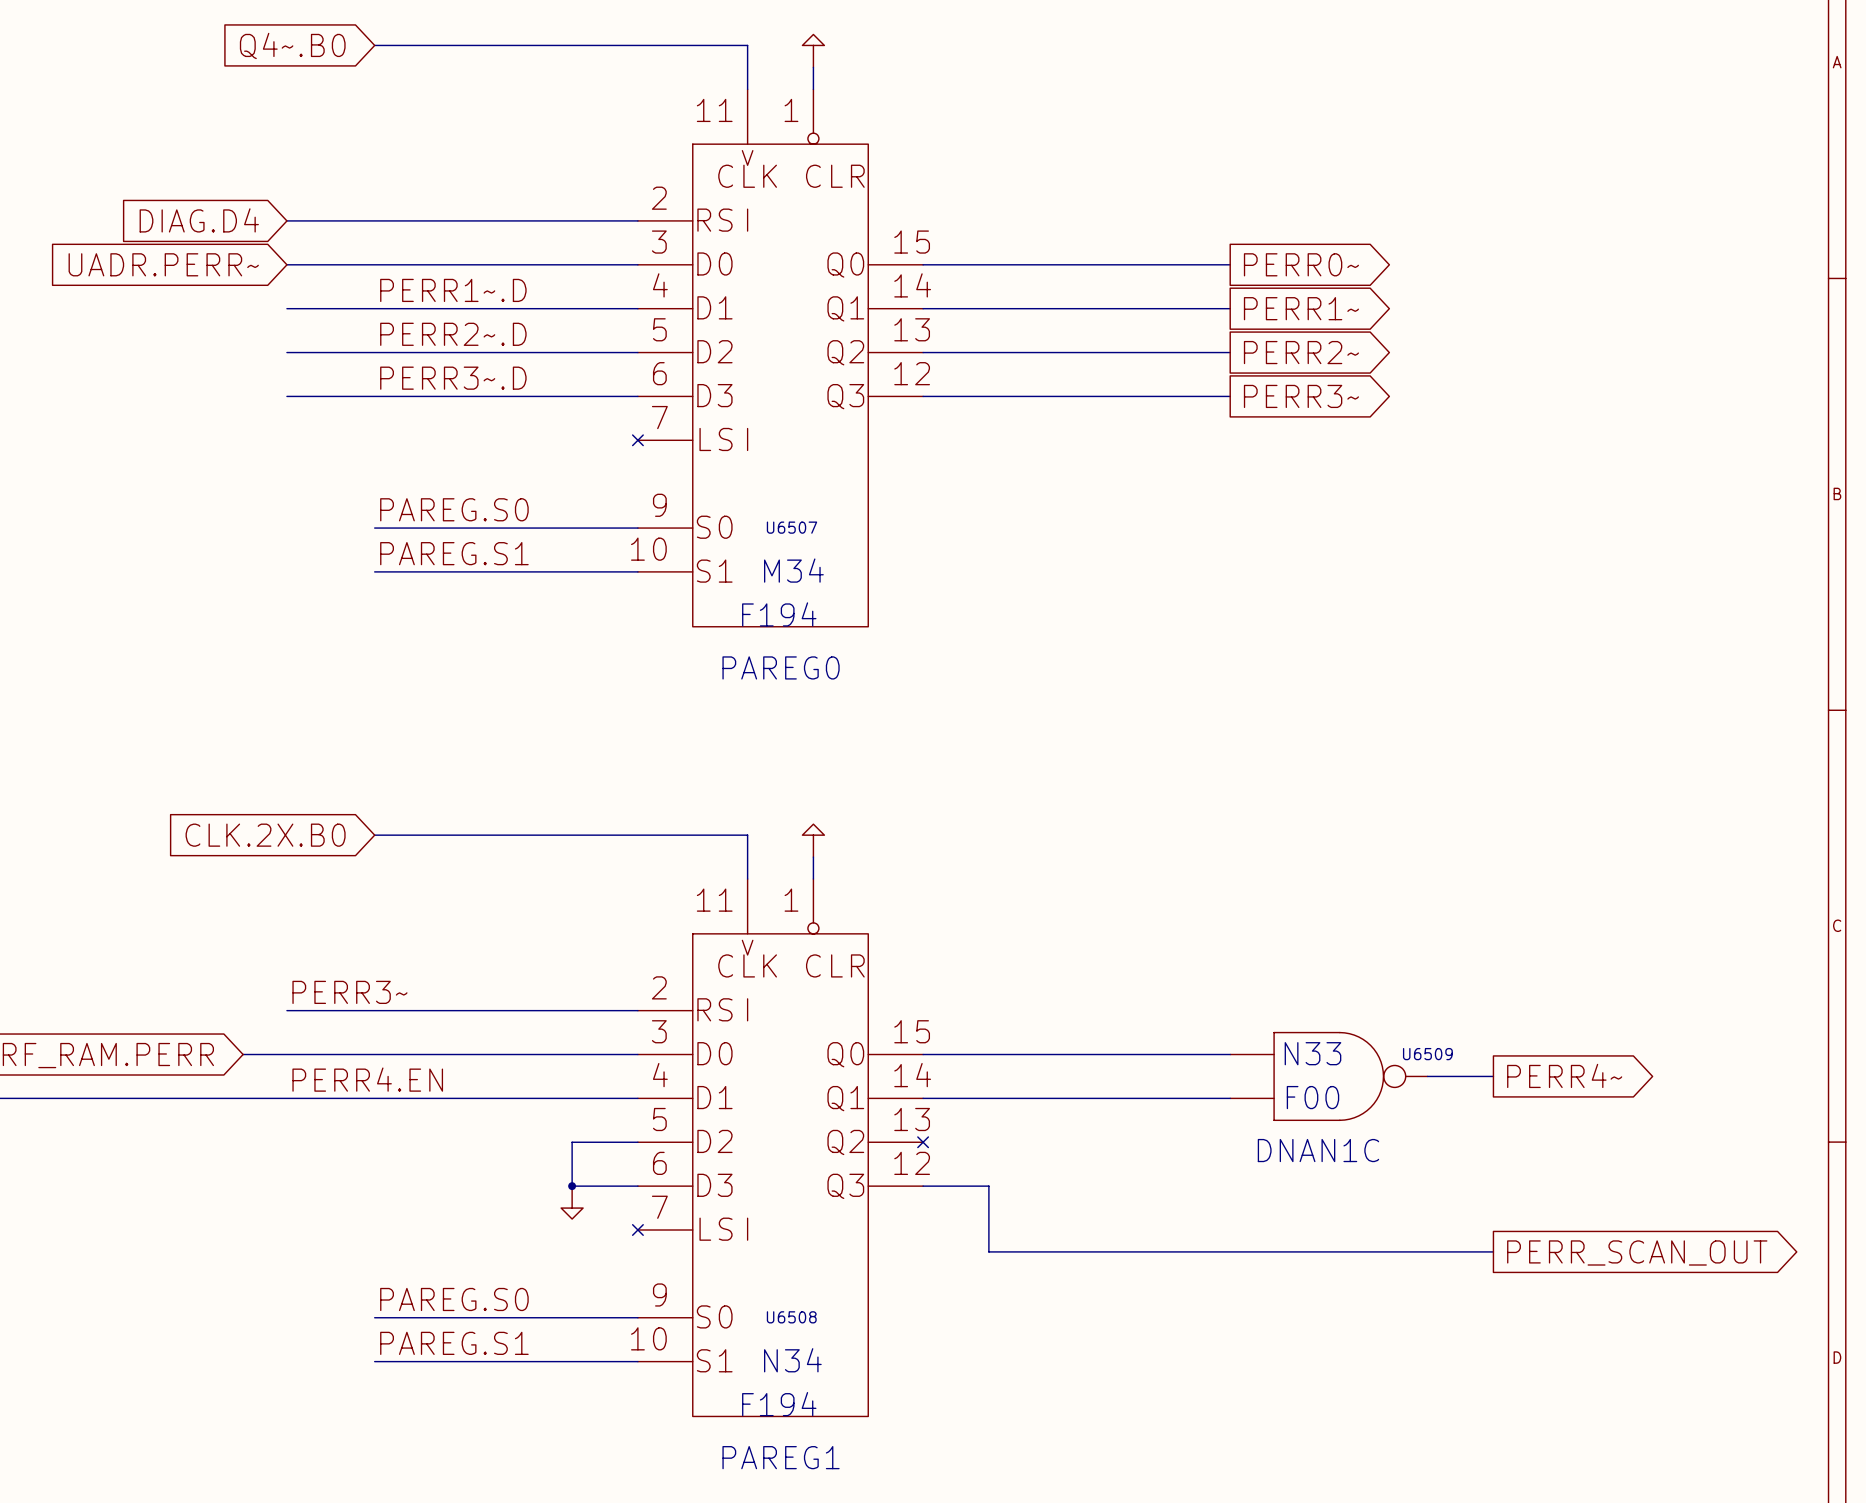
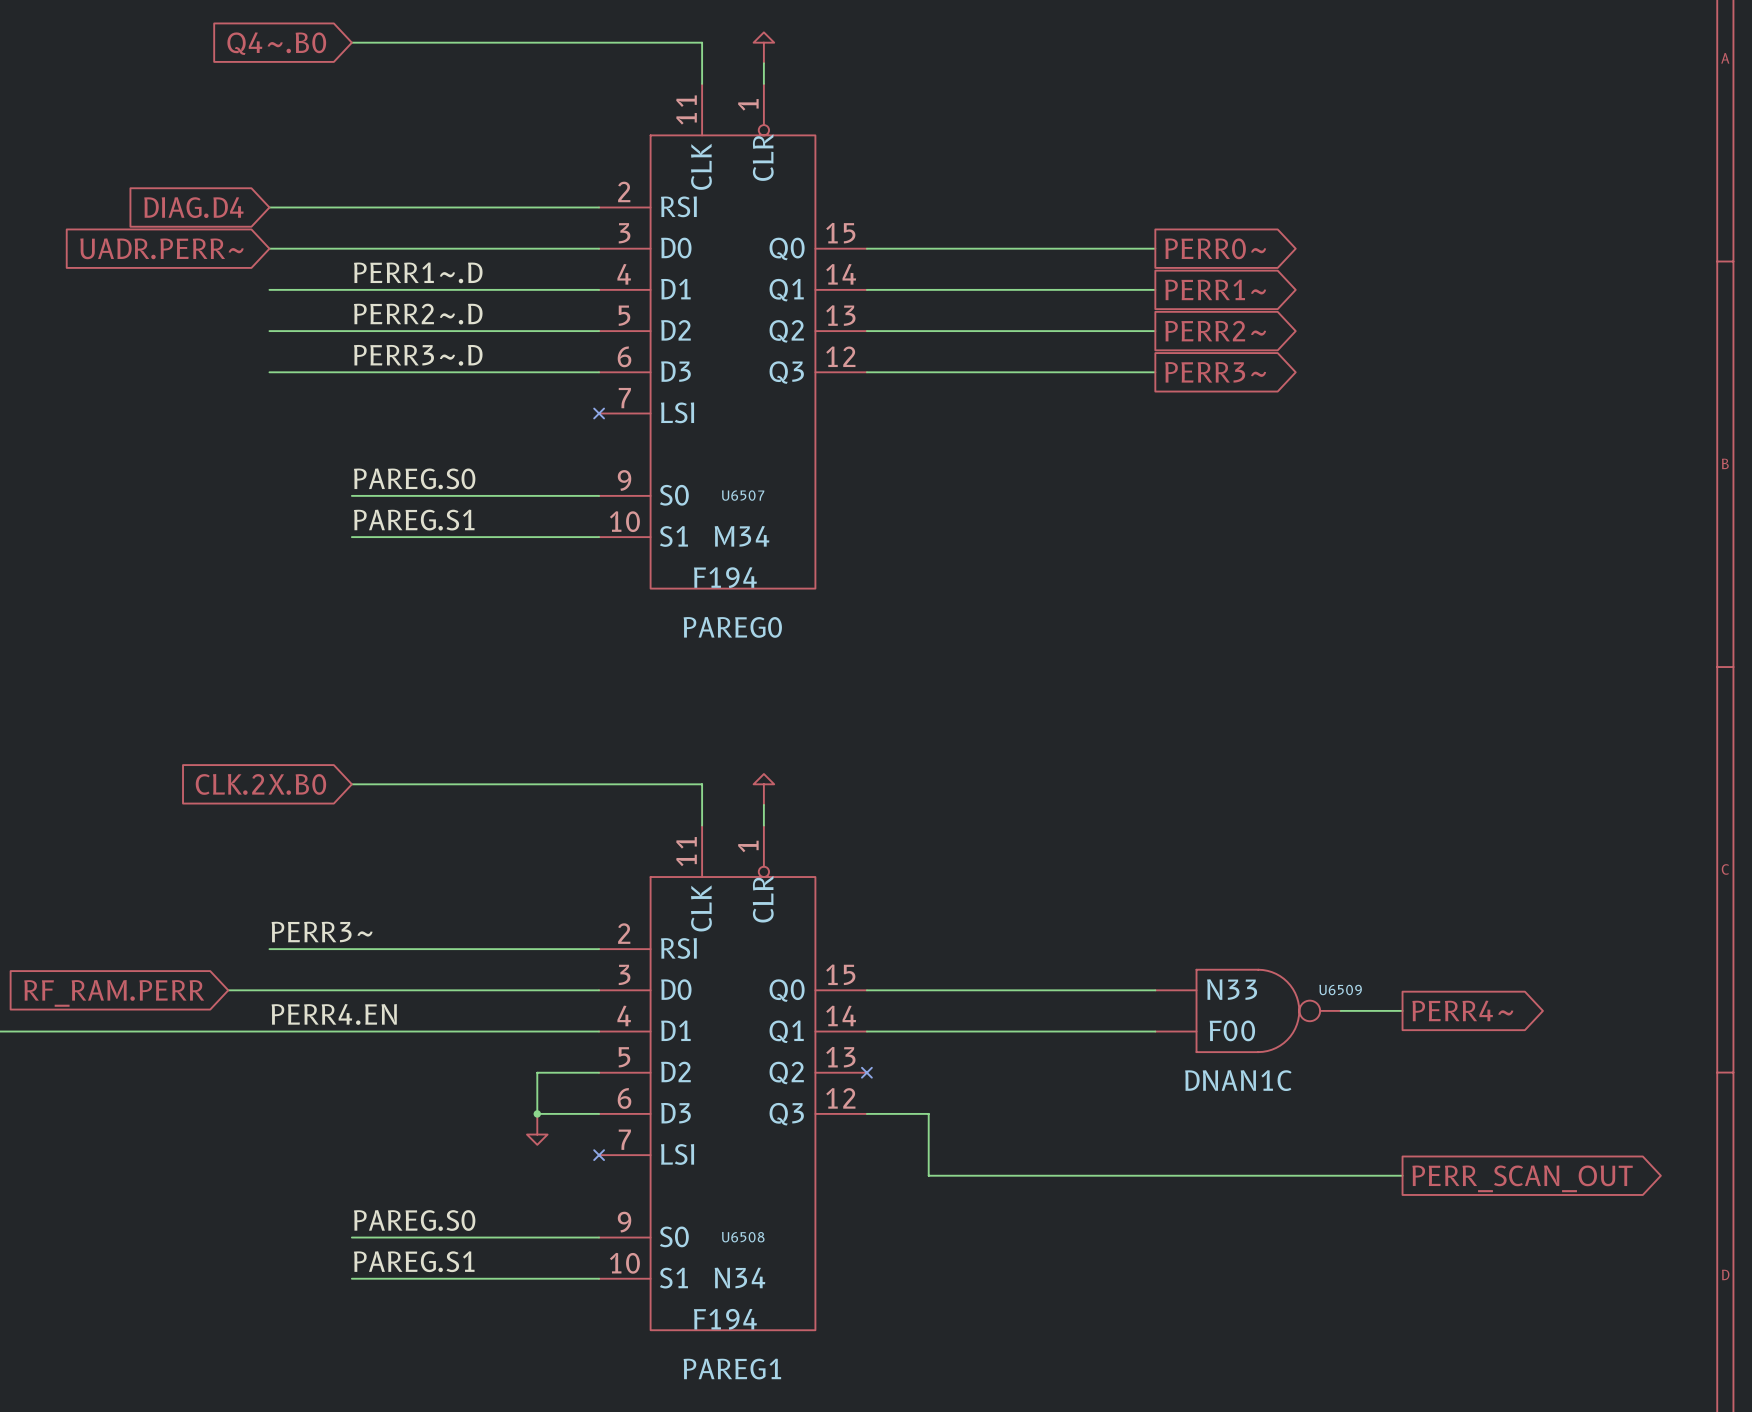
U6507 symbol: [637, 89, 924, 627] -> [599, 83, 867, 589]
U6508 symbol: [637, 879, 924, 1417] -> [599, 825, 867, 1331]

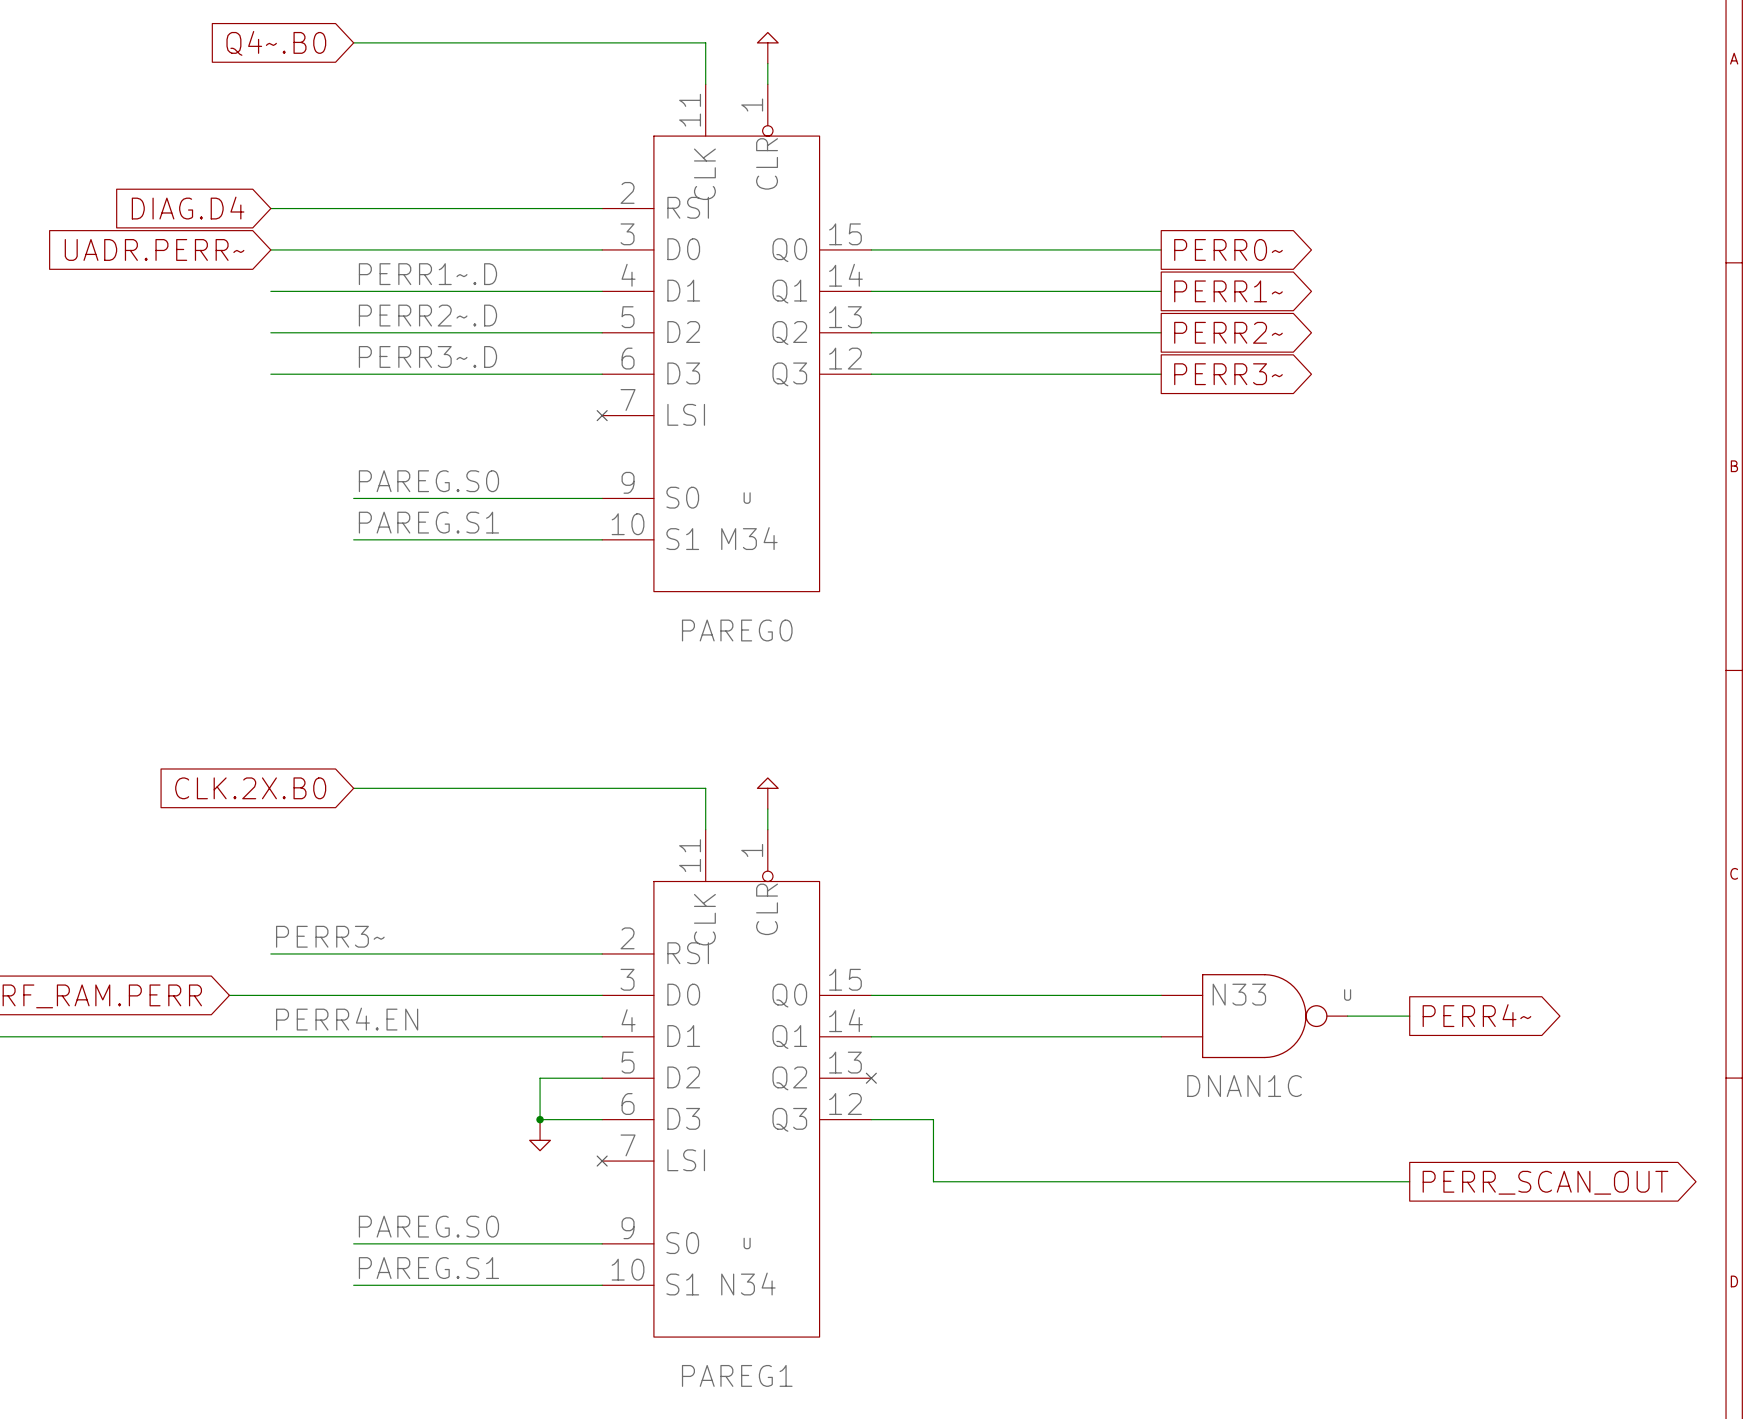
U6507 name: U6507 (743, 495) -> U (747, 498)
U6507 value: F194 (725, 577) -> none
U6509 name: U6509 (1340, 989) -> U (1347, 995)
U6509 value: F00 (1232, 1030) -> none
U6508 name: U6508 (743, 1237) -> U (747, 1243)
U6508 value: F194 (725, 1319) -> none

